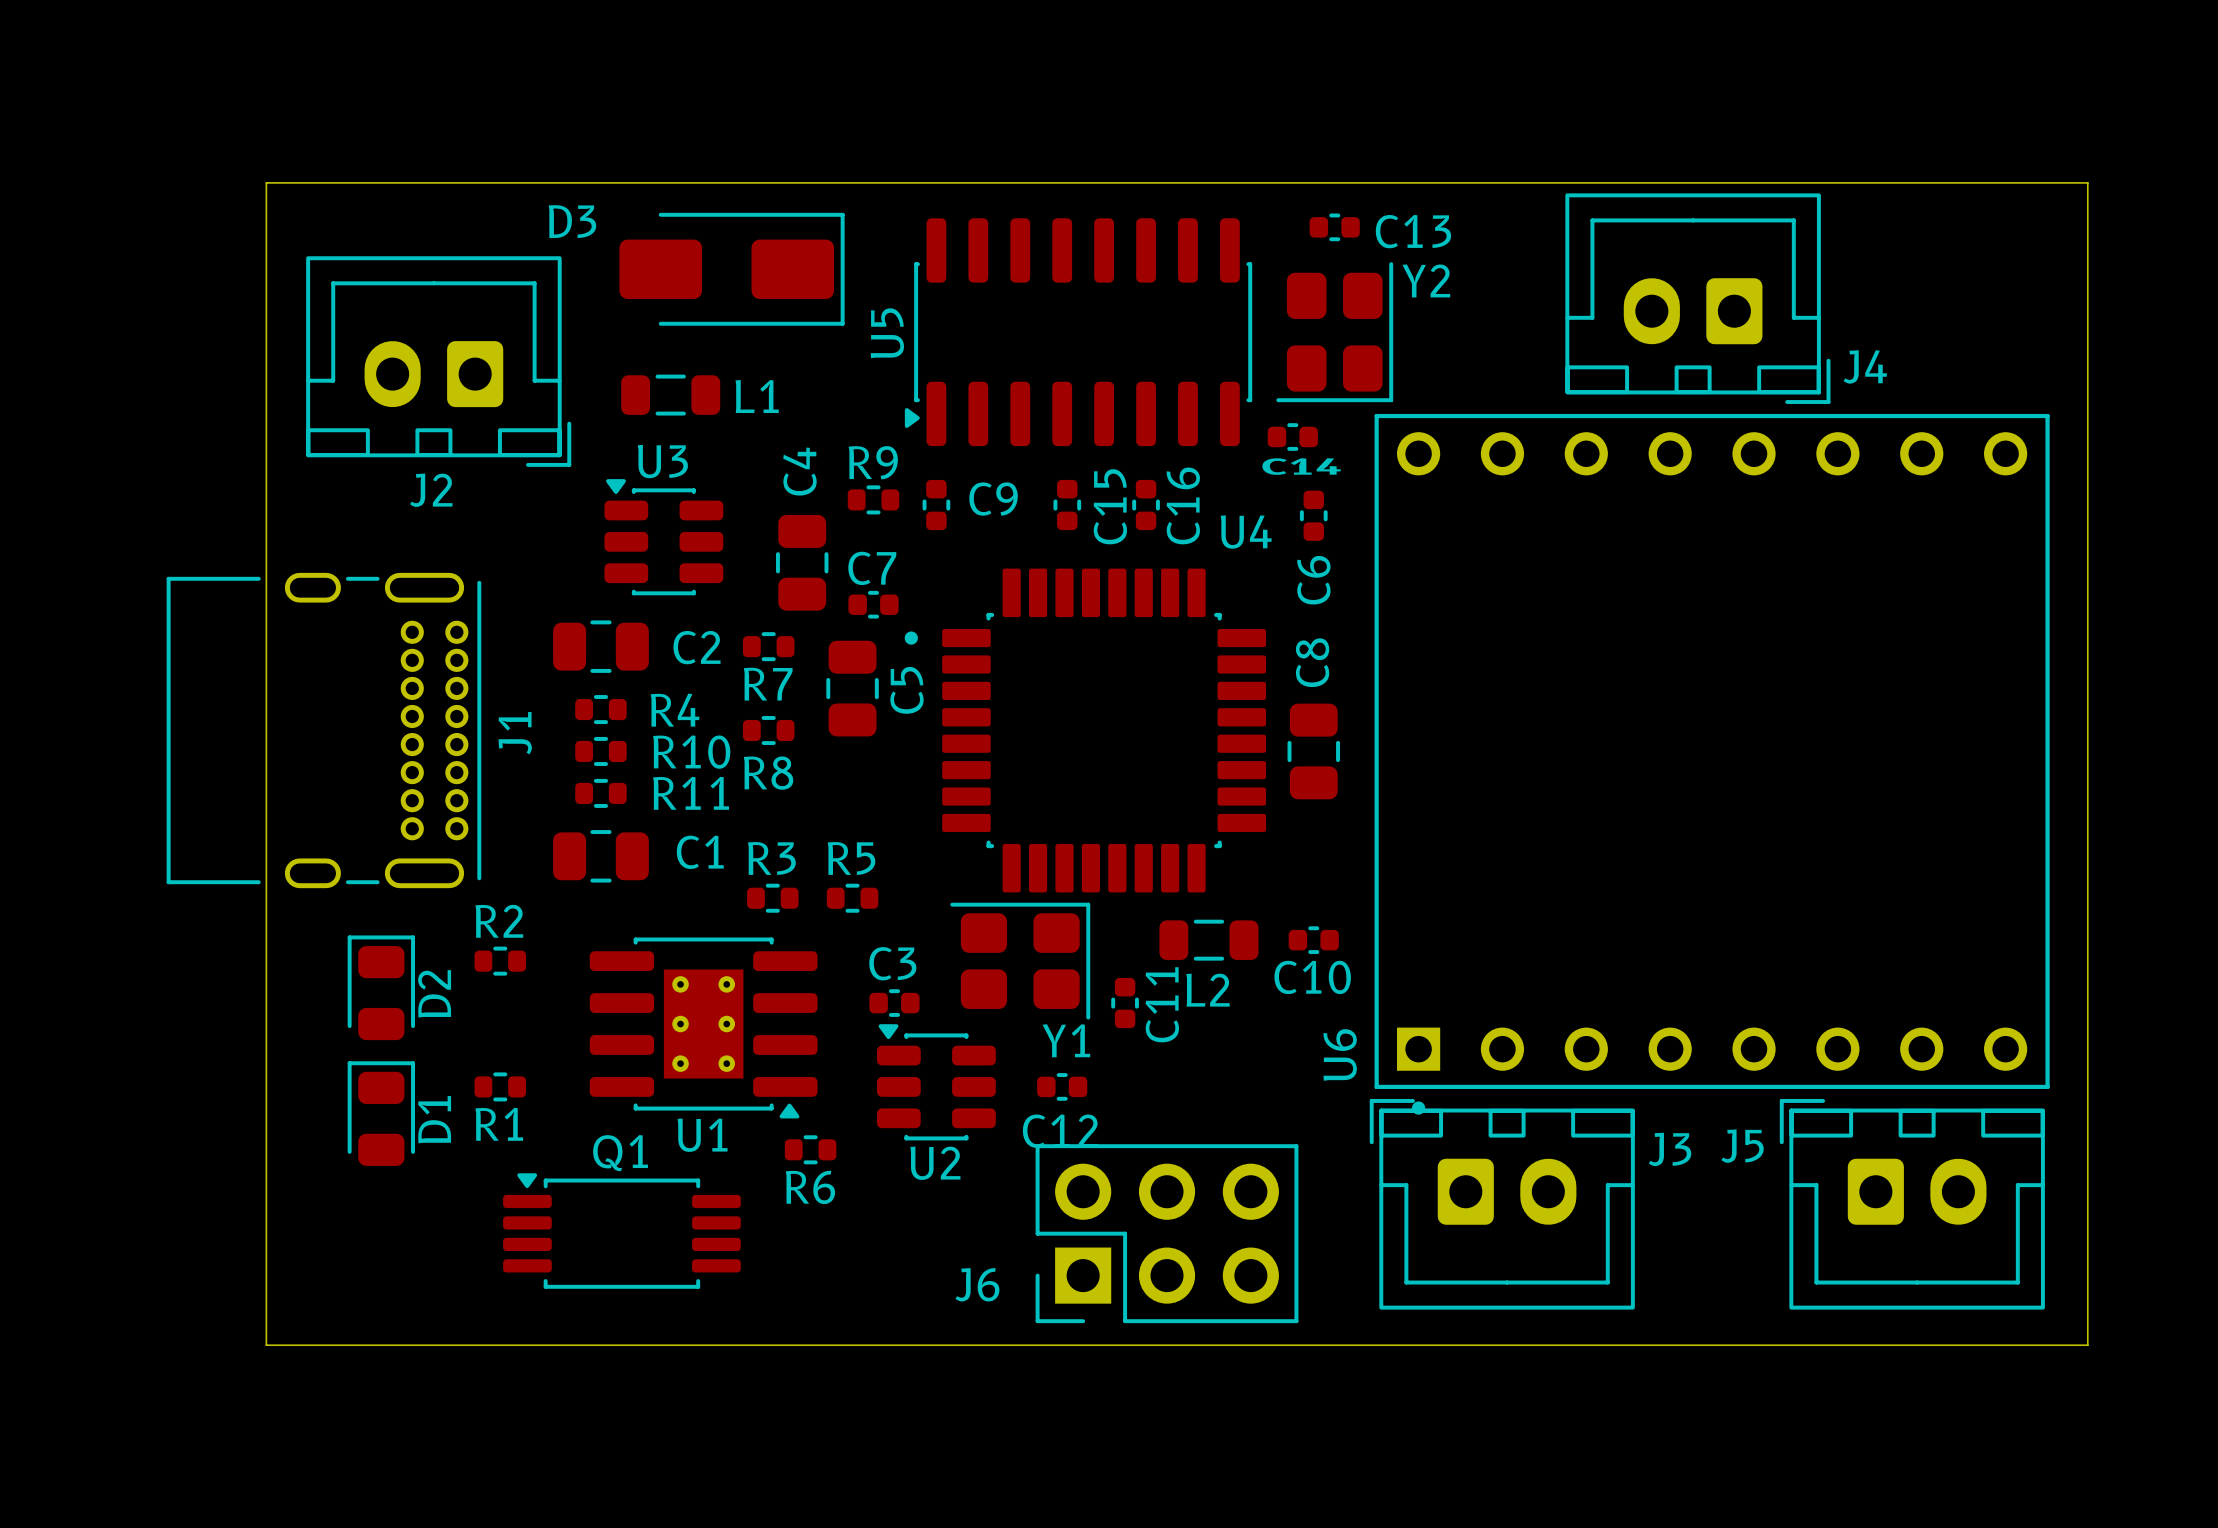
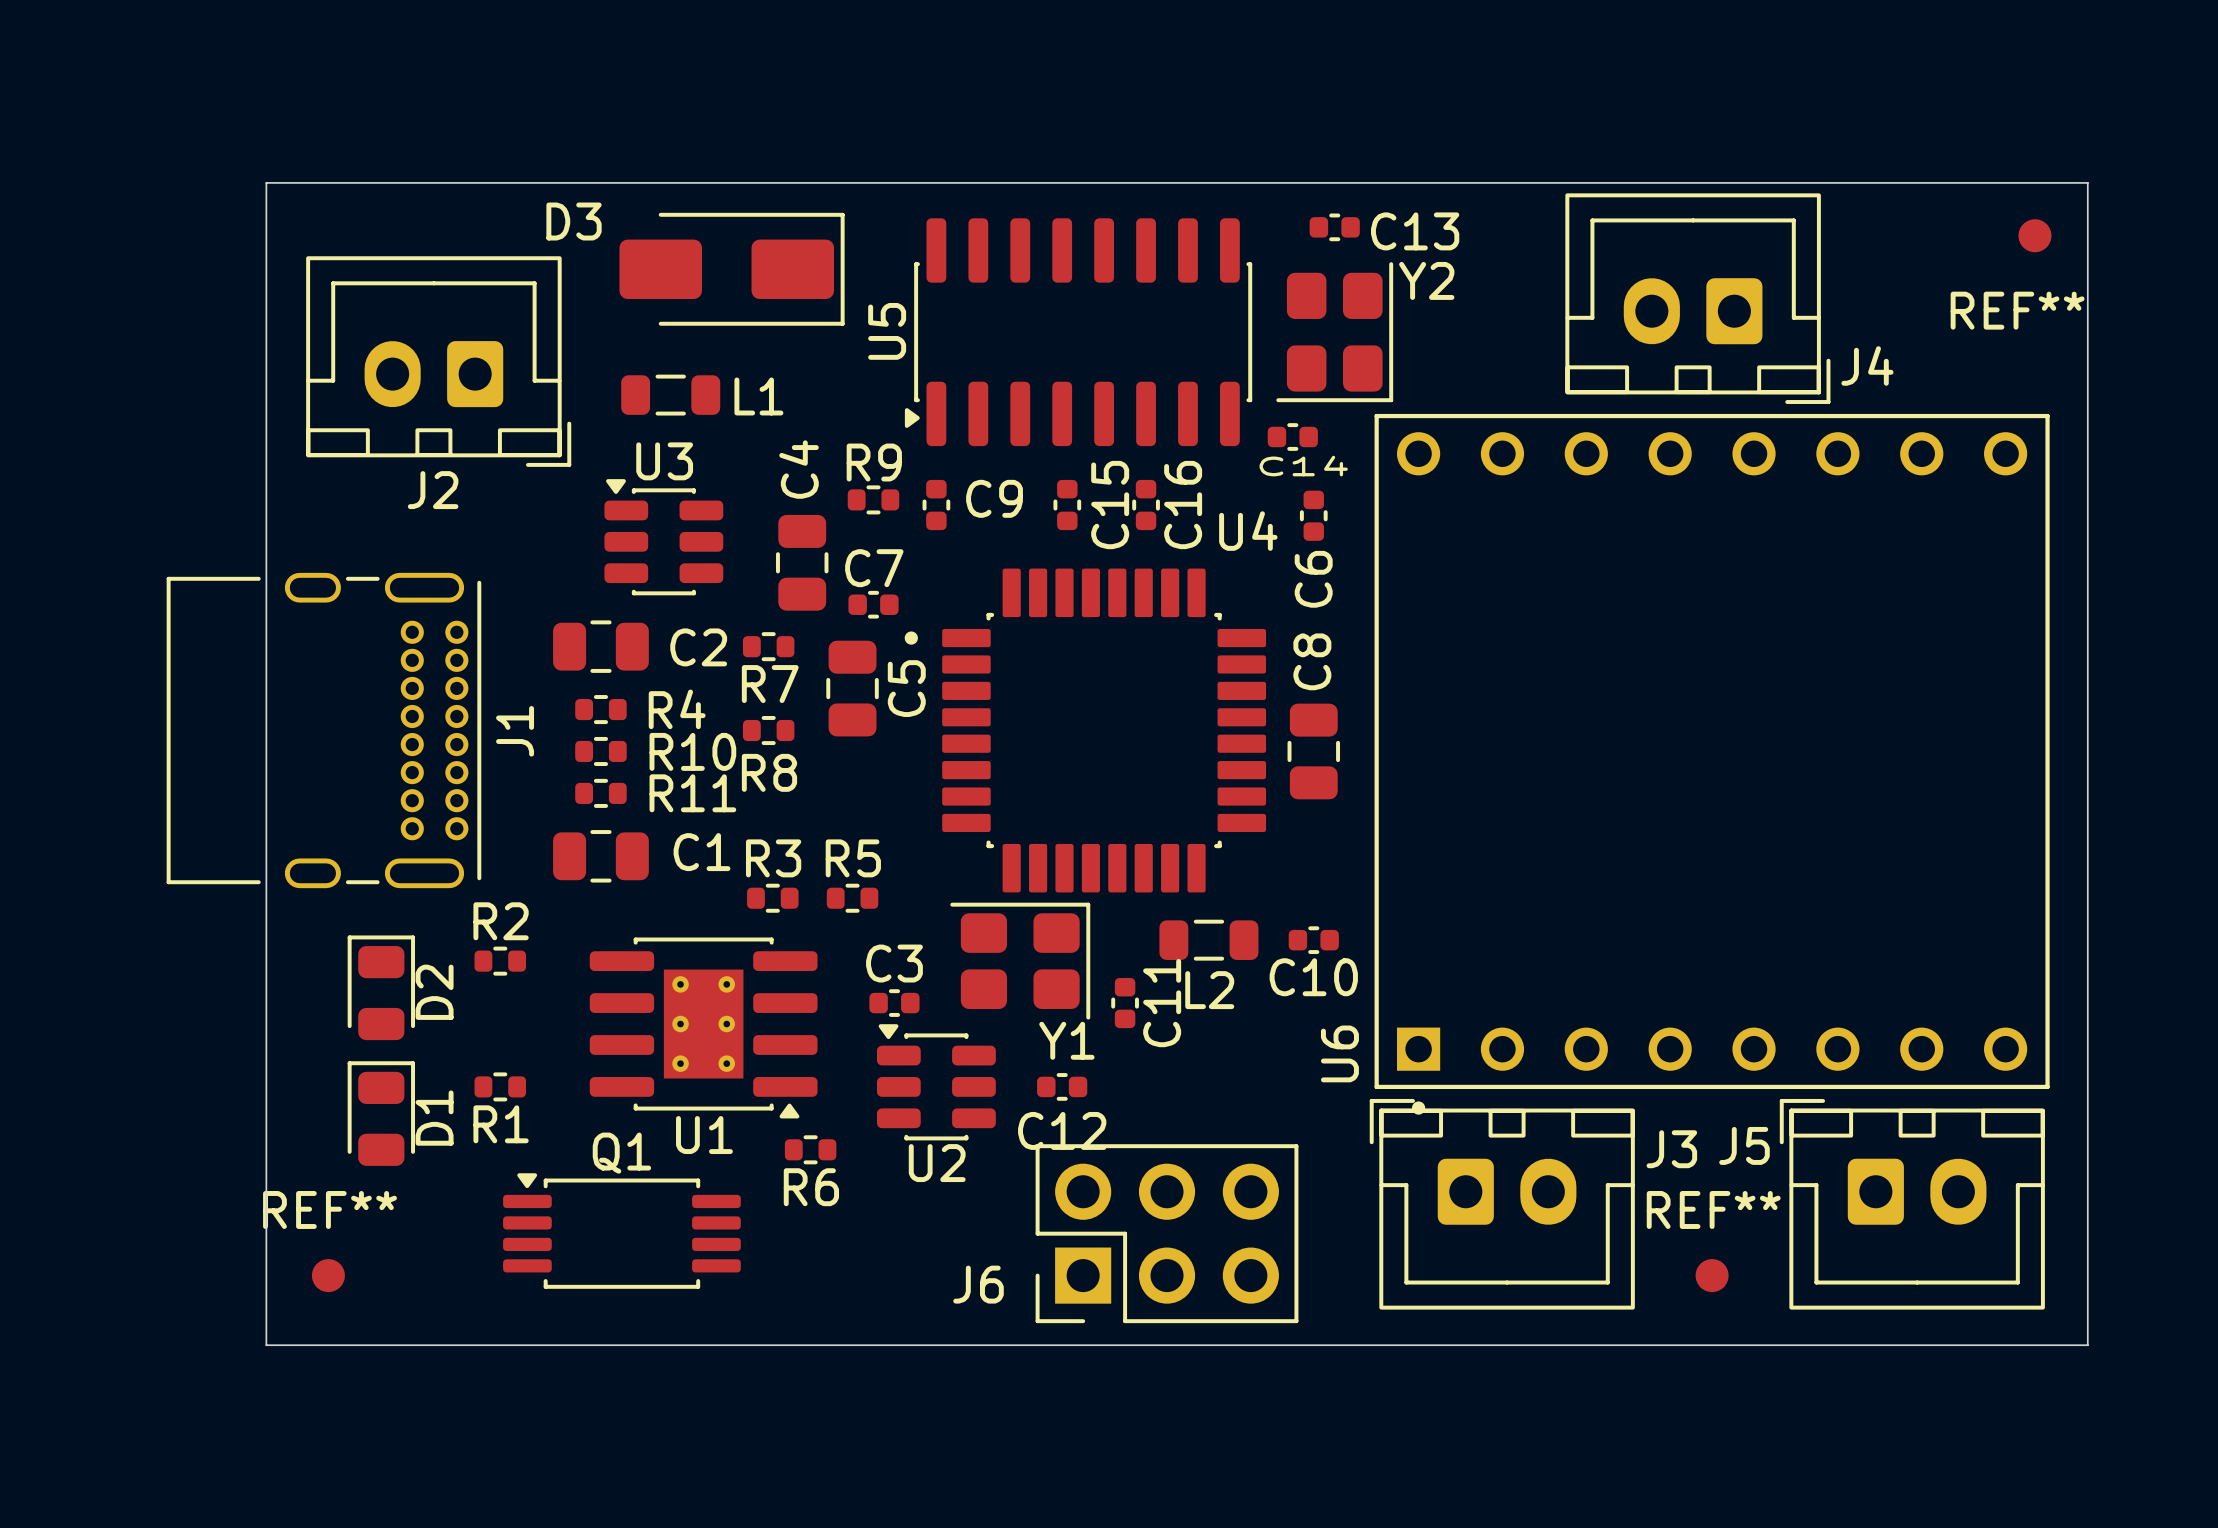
REF**: none -> (2034, 235)
REF**: none -> (328, 1275)
REF**: none -> (1712, 1275)

